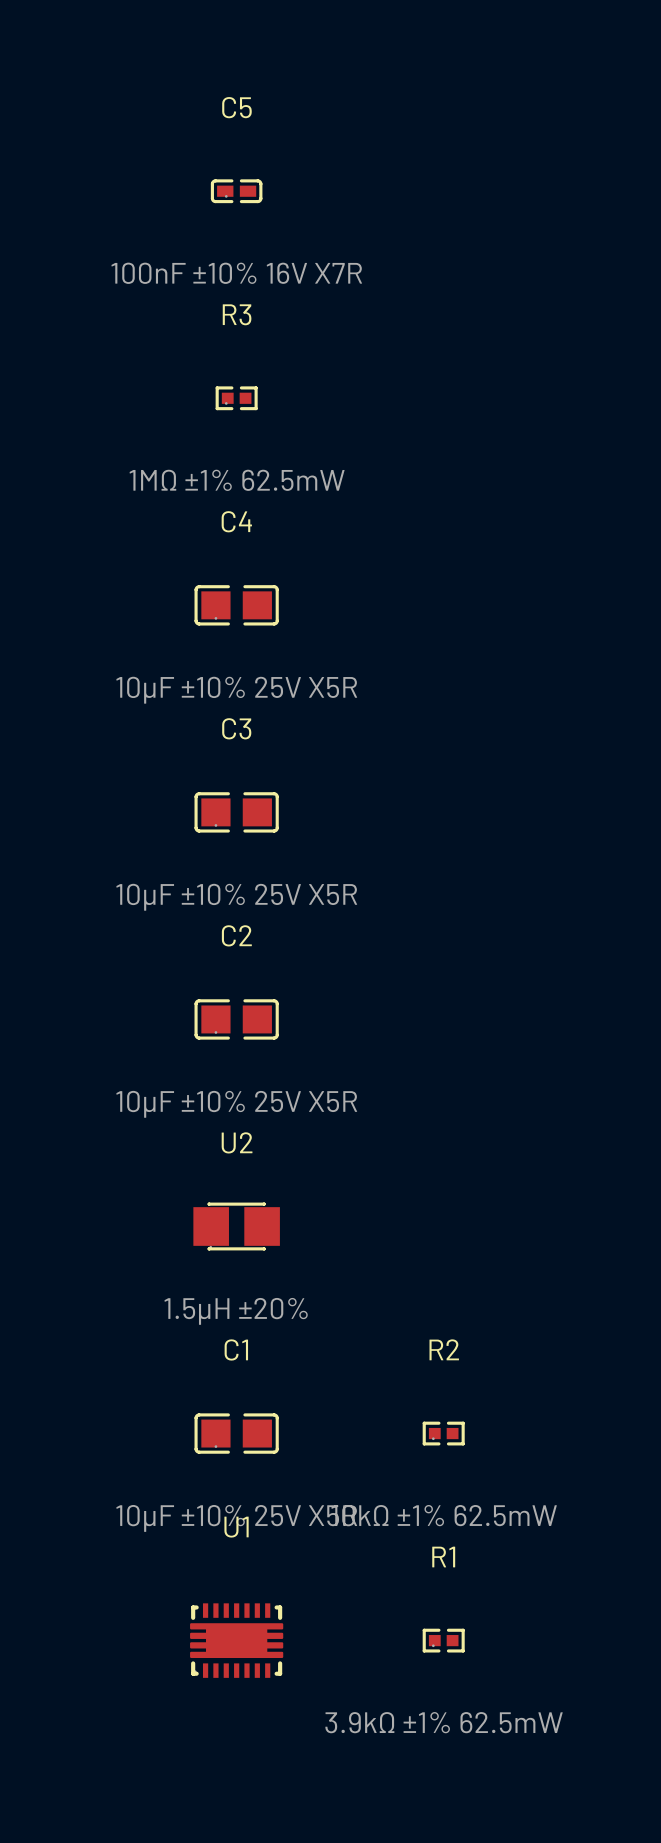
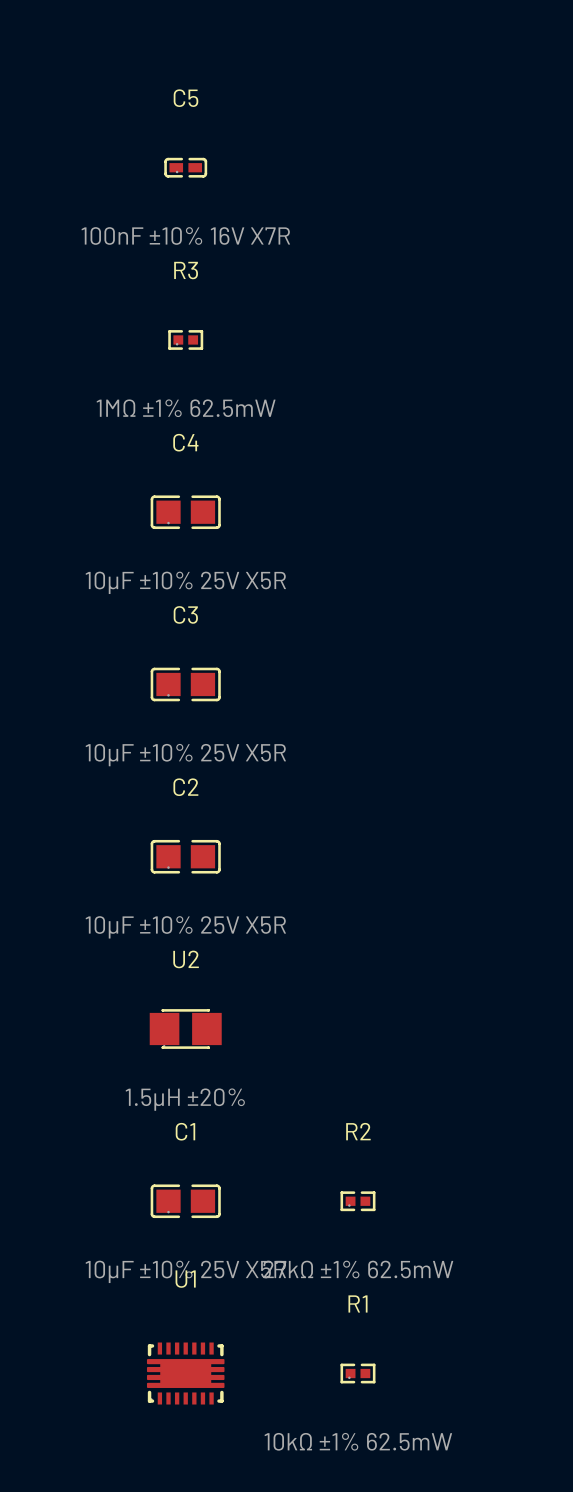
R2 value: 10kΩ ±1% 62.5mW (444, 1515) -> 27kΩ ±1% 62.5mW (358, 1269)
R1 value: 3.9kΩ ±1% 62.5mW (444, 1722) -> 10kΩ ±1% 62.5mW (358, 1441)

